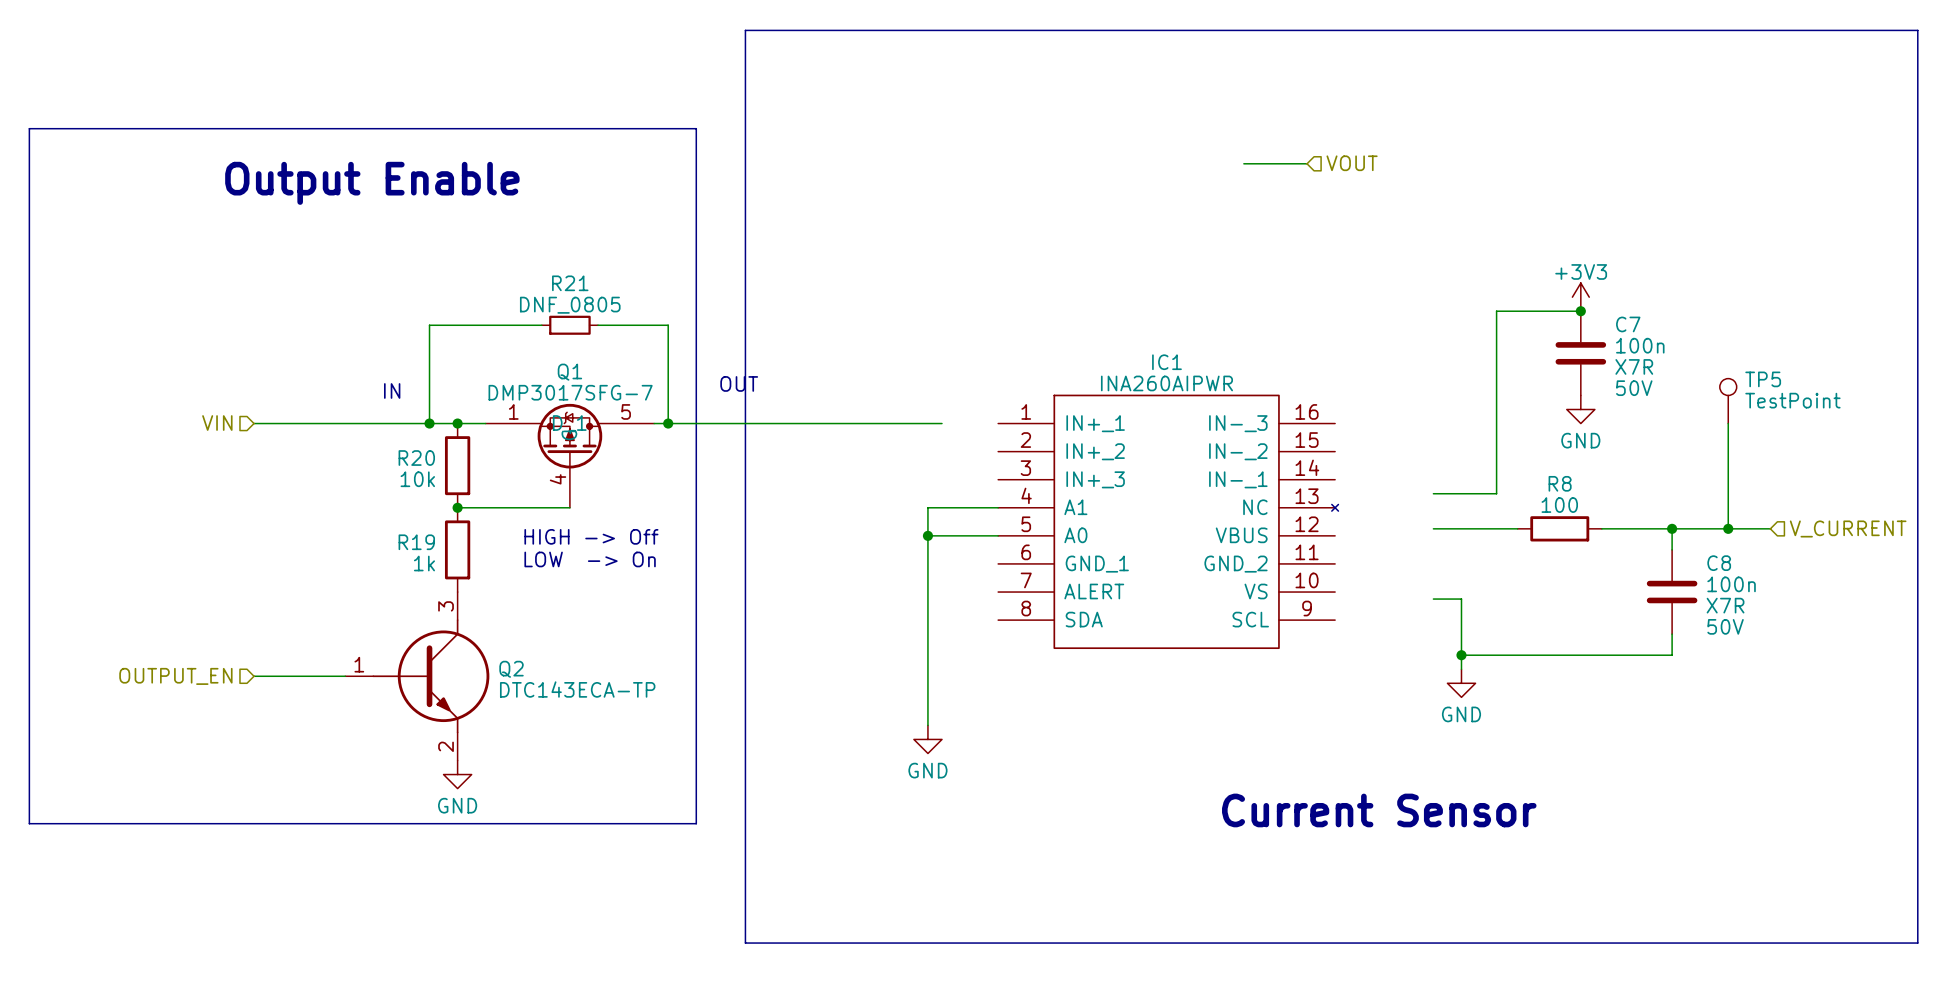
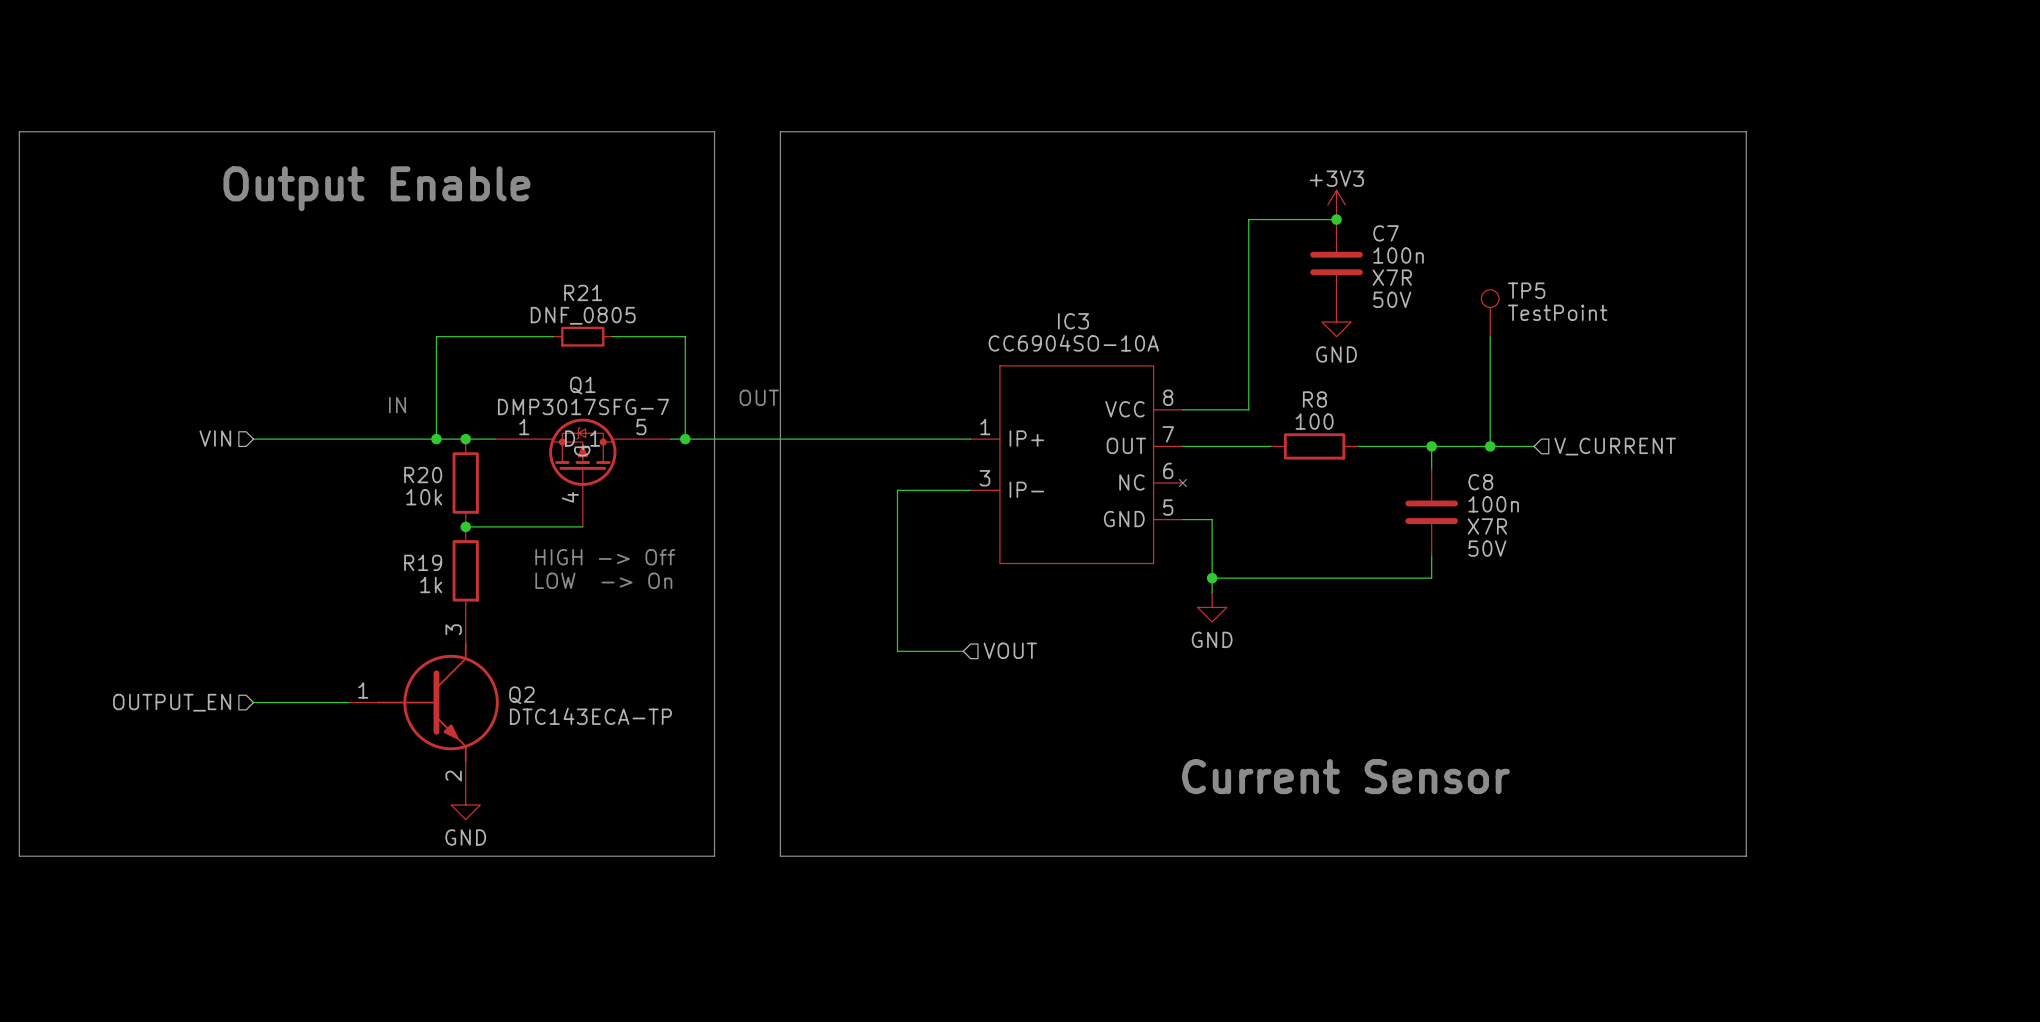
line: (745, 30) (745, 943) (1917, 943) (1917, 30) (745, 30) -> (780, 131) (780, 856) (1746, 856) (1746, 131) (780, 131)
wire: (1243, 163) (1307, 163) -> none
hierarchical label: VOUT (1352, 163) -> none
power symbol: none -> +3V3 (1336, 204)
wire: none -> (1336, 219) (1248, 219) (1248, 409) (1182, 409)
junction: none -> (1336, 219)
power symbol: +3V3 (1580, 297) -> none
power symbol: none -> GND (1336, 322)
wire: (1580, 311) (1496, 311) (1496, 493) (1433, 493) -> none
junction: (1580, 311) -> none
wire: none -> (1490, 336) (1490, 446)
C7 position: (1580, 353) -> (1336, 263)
TP5 position: (1728, 401) -> (1490, 313)
power symbol: GND (1580, 409) -> none
wire: (1728, 423) (1728, 528) -> none
wire: none -> (1182, 446) (1270, 446)
wire: none -> (1358, 446) (1534, 446)
wire: none -> (1431, 446) (1431, 468)
junction: none -> (1431, 446)
junction: none -> (1490, 446)
hierarchical label: none -> V_CURRENT (1615, 446)
IC3: none -> CC6904SO-10A (1078, 464)
wire: none -> (970, 490) (897, 490) (897, 651) (963, 651)
wire: none -> (1182, 519) (1212, 519) (1212, 592)
wire: (998, 507) (927, 507) (927, 725) -> none
IC1: INA260AIPWR (1168, 521) -> none
wire: (1433, 528) (1517, 528) -> none
R8 position: (1559, 528) -> (1314, 446)
wire: (1601, 528) (1770, 528) -> none
wire: (1672, 528) (1672, 549) -> none
junction: (1672, 528) -> none
junction: (1728, 528) -> none
hierarchical label: V_CURRENT (1848, 528) -> none
wire: (927, 535) (998, 535) -> none
junction: (927, 535) -> none
wire: none -> (1431, 556) (1431, 578) (1212, 578)
junction: none -> (1212, 578)
power symbol: none -> GND (1212, 607)
C8 position: (1672, 592) -> (1431, 512)
wire: (1433, 599) (1461, 599) (1461, 669) -> none
hierarchical label: none -> VOUT (1010, 650)
wire: (1672, 634) (1672, 655) (1461, 655) -> none
junction: (1461, 655) -> none
power symbol: GND (1461, 683) -> none
power symbol: GND (927, 739) -> none
text position: Current Sensor (1379, 810) -> Current Sensor (1345, 776)

